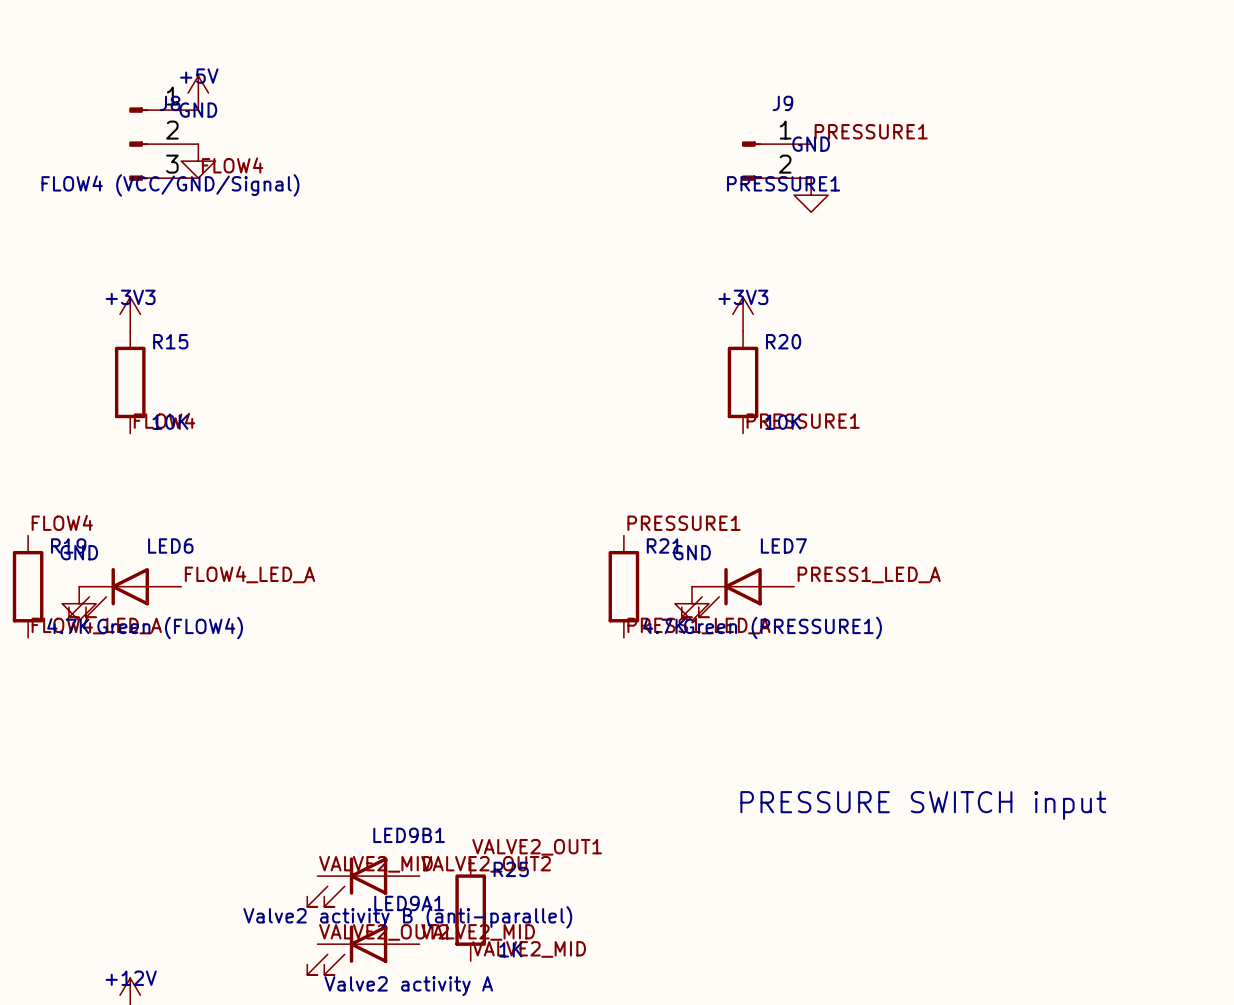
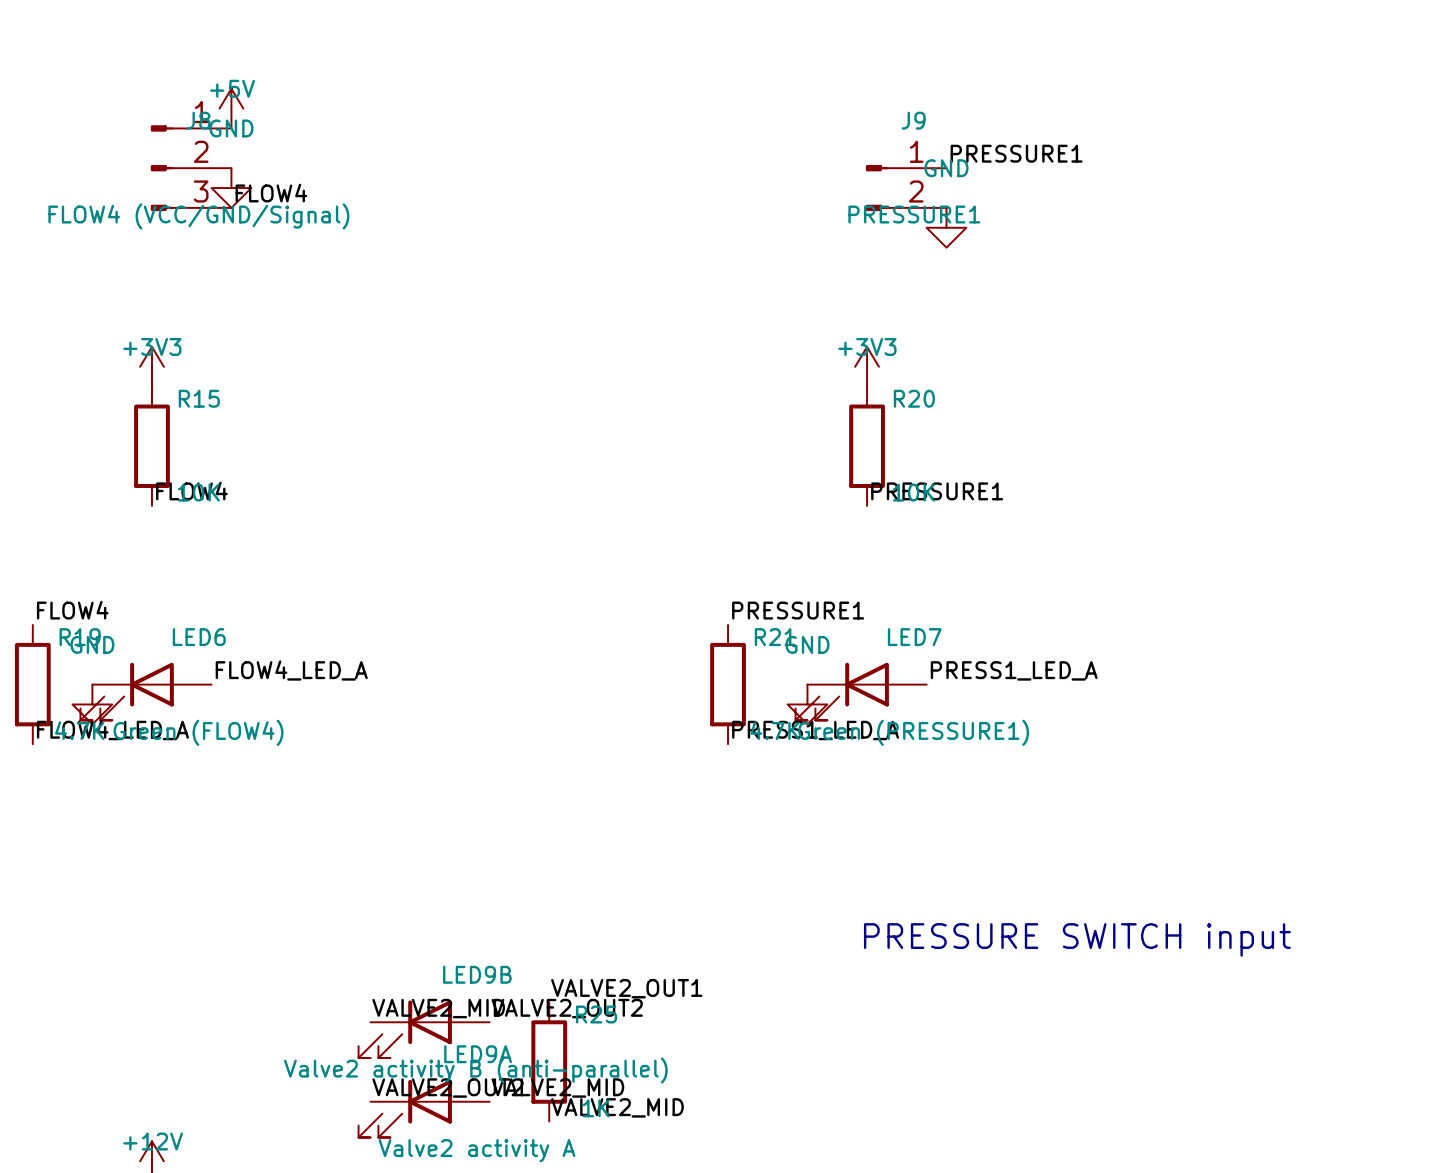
LED9B1 name: LED9B1 (409, 835) -> LED9B (477, 974)
LED9A1 name: LED9A1 (409, 903) -> LED9A (478, 1054)

